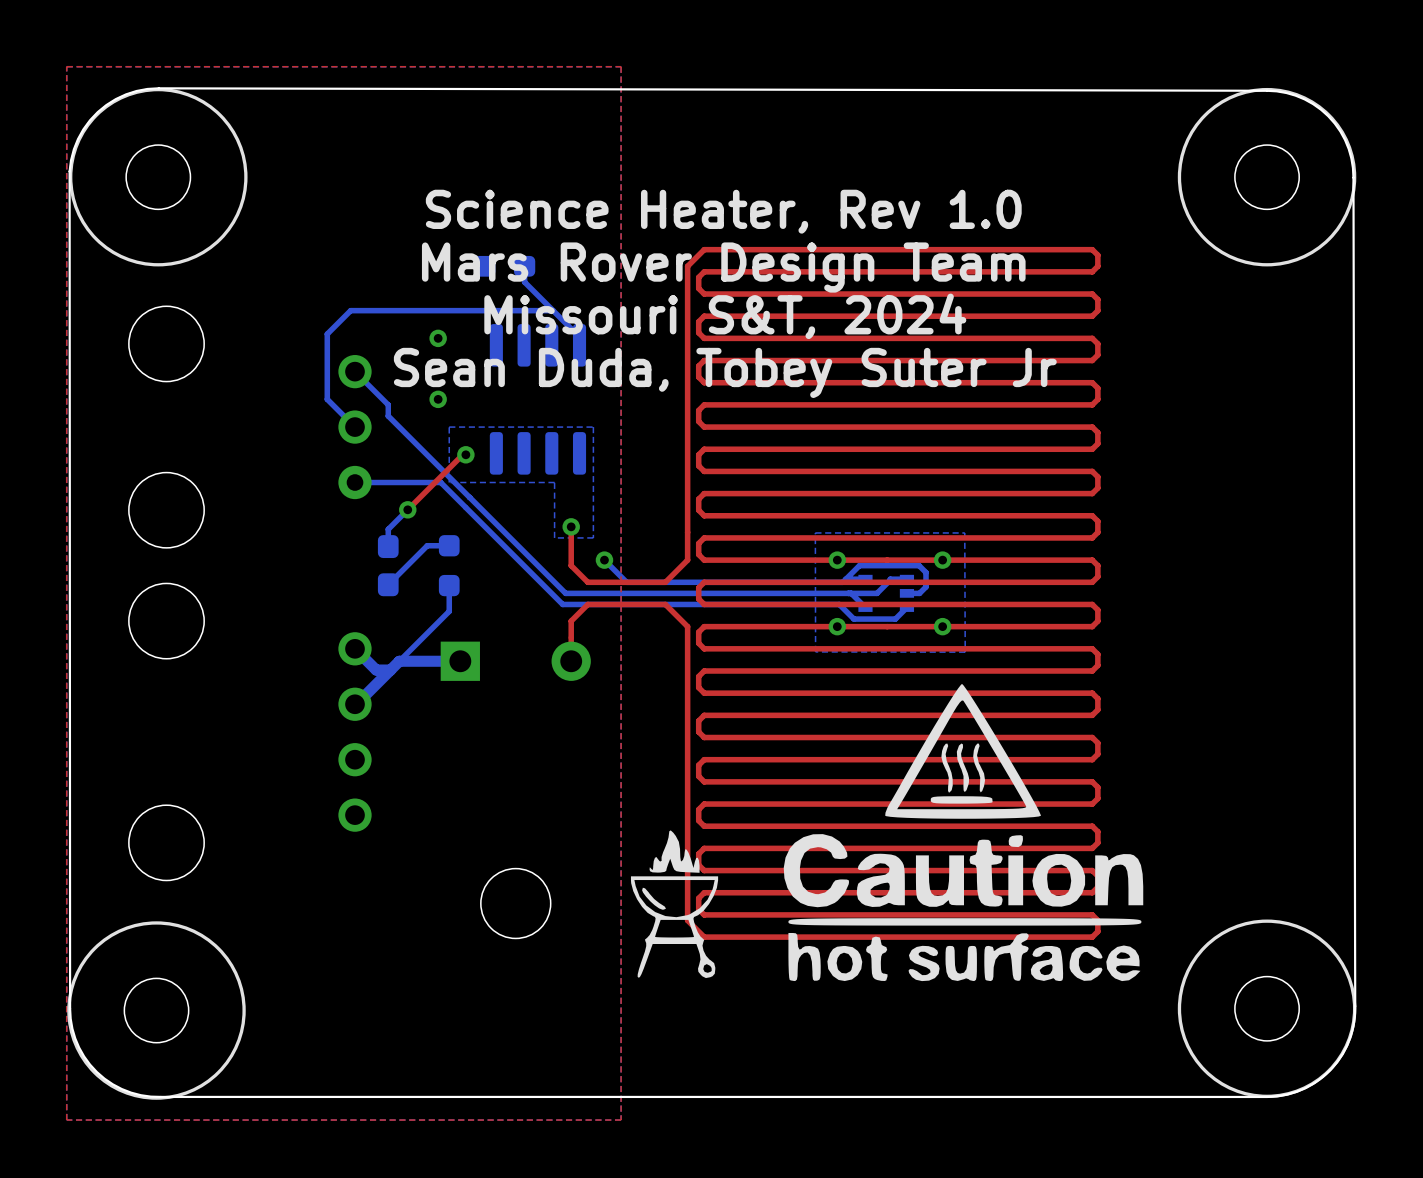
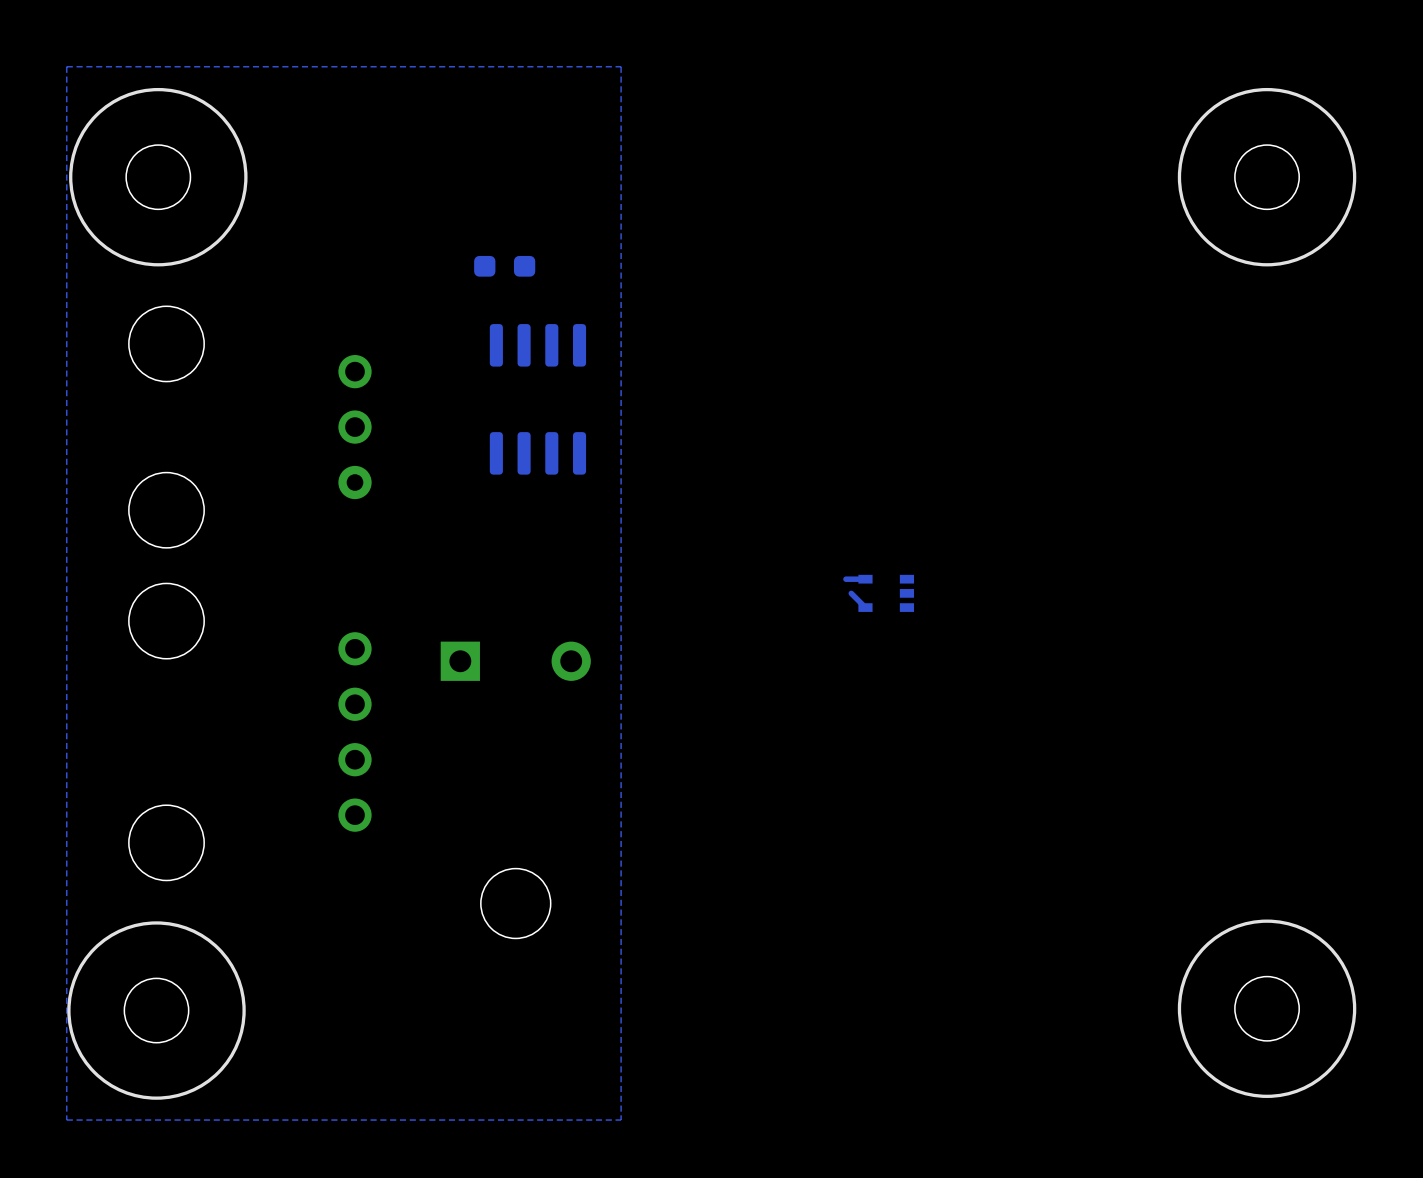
top zone outline: (66, 66) (621, 66) (621, 1120) (66, 1120) (66, 66) -> none
board edge: (158, 88) (1267, 90) (1295, 95) (1321, 109) (1334, 123) (1345, 139) (1351, 158) (1353, 177) (1355, 1006) (1350, 1035) (1336, 1062) (1322, 1077) (1305, 1087) (1287, 1094) (1267, 1096) (160, 1096) (131, 1092) (104, 1078) (90, 1064) (79, 1047) (72, 1028) (70, 1008) (69, 171) (78, 139) (97, 112) (125, 94) (158, 88) -> none
text: Science Heater, Rev 1.0 (723, 211) -> none
bottom track: (524, 266) (524, 282) (579, 337) (579, 345) -> none
text: Mars Rover Design Team (723, 267) -> none
bottom track: (553, 310) (350, 310) (327, 334) (327, 399) (355, 427) -> none
text: Missouri S&T, 2024 (725, 316) -> none
via: (438, 338) -> none
bottom track: (355, 371) (388, 404) (388, 415) (565, 593) (877, 593) (890, 579) (906, 579) -> none
text: Sean Duda, Tobey Suter Jr (725, 372) -> none
via: (438, 399) -> none
bottom zone outline: (449, 427) (593, 427) (593, 537) (554, 537) (554, 482) (449, 482) (449, 427) -> none
top track: (465, 454) (462, 454) (407, 509) -> none
via: (465, 454) -> none
bottom track: (355, 482) (440, 482) (562, 604) (839, 604) (853, 619) (895, 619) (906, 607) -> none
bottom track: (407, 509) (388, 529) (388, 546) -> none
via: (407, 509) -> none
top track: (571, 526) (571, 565) (587, 582) (665, 582) (687, 560) (687, 266) (704, 249) (1092, 249) (1097, 255) (1097, 266) (1092, 271) (704, 271) (698, 277) (698, 288) (704, 294) (1092, 294) (1097, 299) (1097, 310) (1092, 316) (704, 316) (698, 321) (698, 332) (704, 338) (1092, 338) (1097, 343) (1097, 355) (1092, 360) (704, 360) (698, 366) (698, 377) (704, 382) (1092, 382) (1097, 388) (1097, 399) (1092, 404) (704, 404) (698, 410) (698, 421) (704, 427) (1092, 427) (1097, 432) (1097, 443) (1092, 449) (704, 449) (698, 454) (698, 465) (704, 471) (1092, 471) (1097, 476) (1097, 488) (1092, 493) (704, 493) (698, 499) (698, 510) (704, 515) (1092, 515) (1097, 521) (1097, 532) (1092, 537) (704, 537) (698, 543) (698, 554) (704, 560) (1092, 560) (1097, 565) (1097, 576) (1092, 582) (704, 582) (698, 587) (698, 598) (704, 604) (1092, 604) (1097, 610) (1097, 621) (1092, 626) (704, 626) (698, 632) (698, 643) (704, 648) (1092, 648) (1097, 654) (1097, 665) (1092, 670) (704, 670) (698, 676) (698, 687) (704, 693) (1092, 693) (1097, 698) (1097, 709) (1092, 715) (704, 715) (698, 720) (698, 731) (704, 737) (1092, 737) (1097, 743) (1097, 754) (1092, 759) (704, 759) (698, 765) (698, 776) (704, 781) (1092, 781) (1097, 787) (1097, 798) (1092, 804) (704, 804) (698, 809) (698, 820) (704, 826) (1092, 826) (1097, 831) (1097, 842) (1092, 848) (704, 848) (698, 853) (698, 865) (704, 870) (1092, 870) (1097, 876) (1097, 887) (1092, 892) (704, 892) (698, 898) (698, 909) (704, 914) (1092, 914) (1097, 920) (1097, 931) (1092, 937) (704, 937) (687, 920) (687, 626) (665, 604) (587, 604) (571, 621) (571, 661) -> none
via: (571, 526) -> none
bottom zone outline: (815, 532) (964, 532) (965, 652) (815, 651) (815, 532) -> none
bottom track: (449, 545) (427, 545) (388, 584) -> none
bottom track: (604, 560) (626, 582) (842, 582) (859, 565) (919, 565) (926, 572) (926, 586) (919, 593) (906, 593) -> none
via: (604, 560) -> none
via: (837, 560) -> none
via: (942, 560) -> none
part: (388, 565) -> none
part: (449, 565) -> none
bottom track: (449, 585) (449, 611) (399, 661) -> none
via: (837, 626) -> none
via: (942, 626) -> none
bottom track: (355, 648) (376, 670) (390, 670) -> none
bottom track: (399, 661) (355, 704) -> none
bottom track: (399, 661) (460, 661) -> none
drawing: [783, 683, 1144, 982] -> none
drawing: [630, 830, 719, 979] -> none

